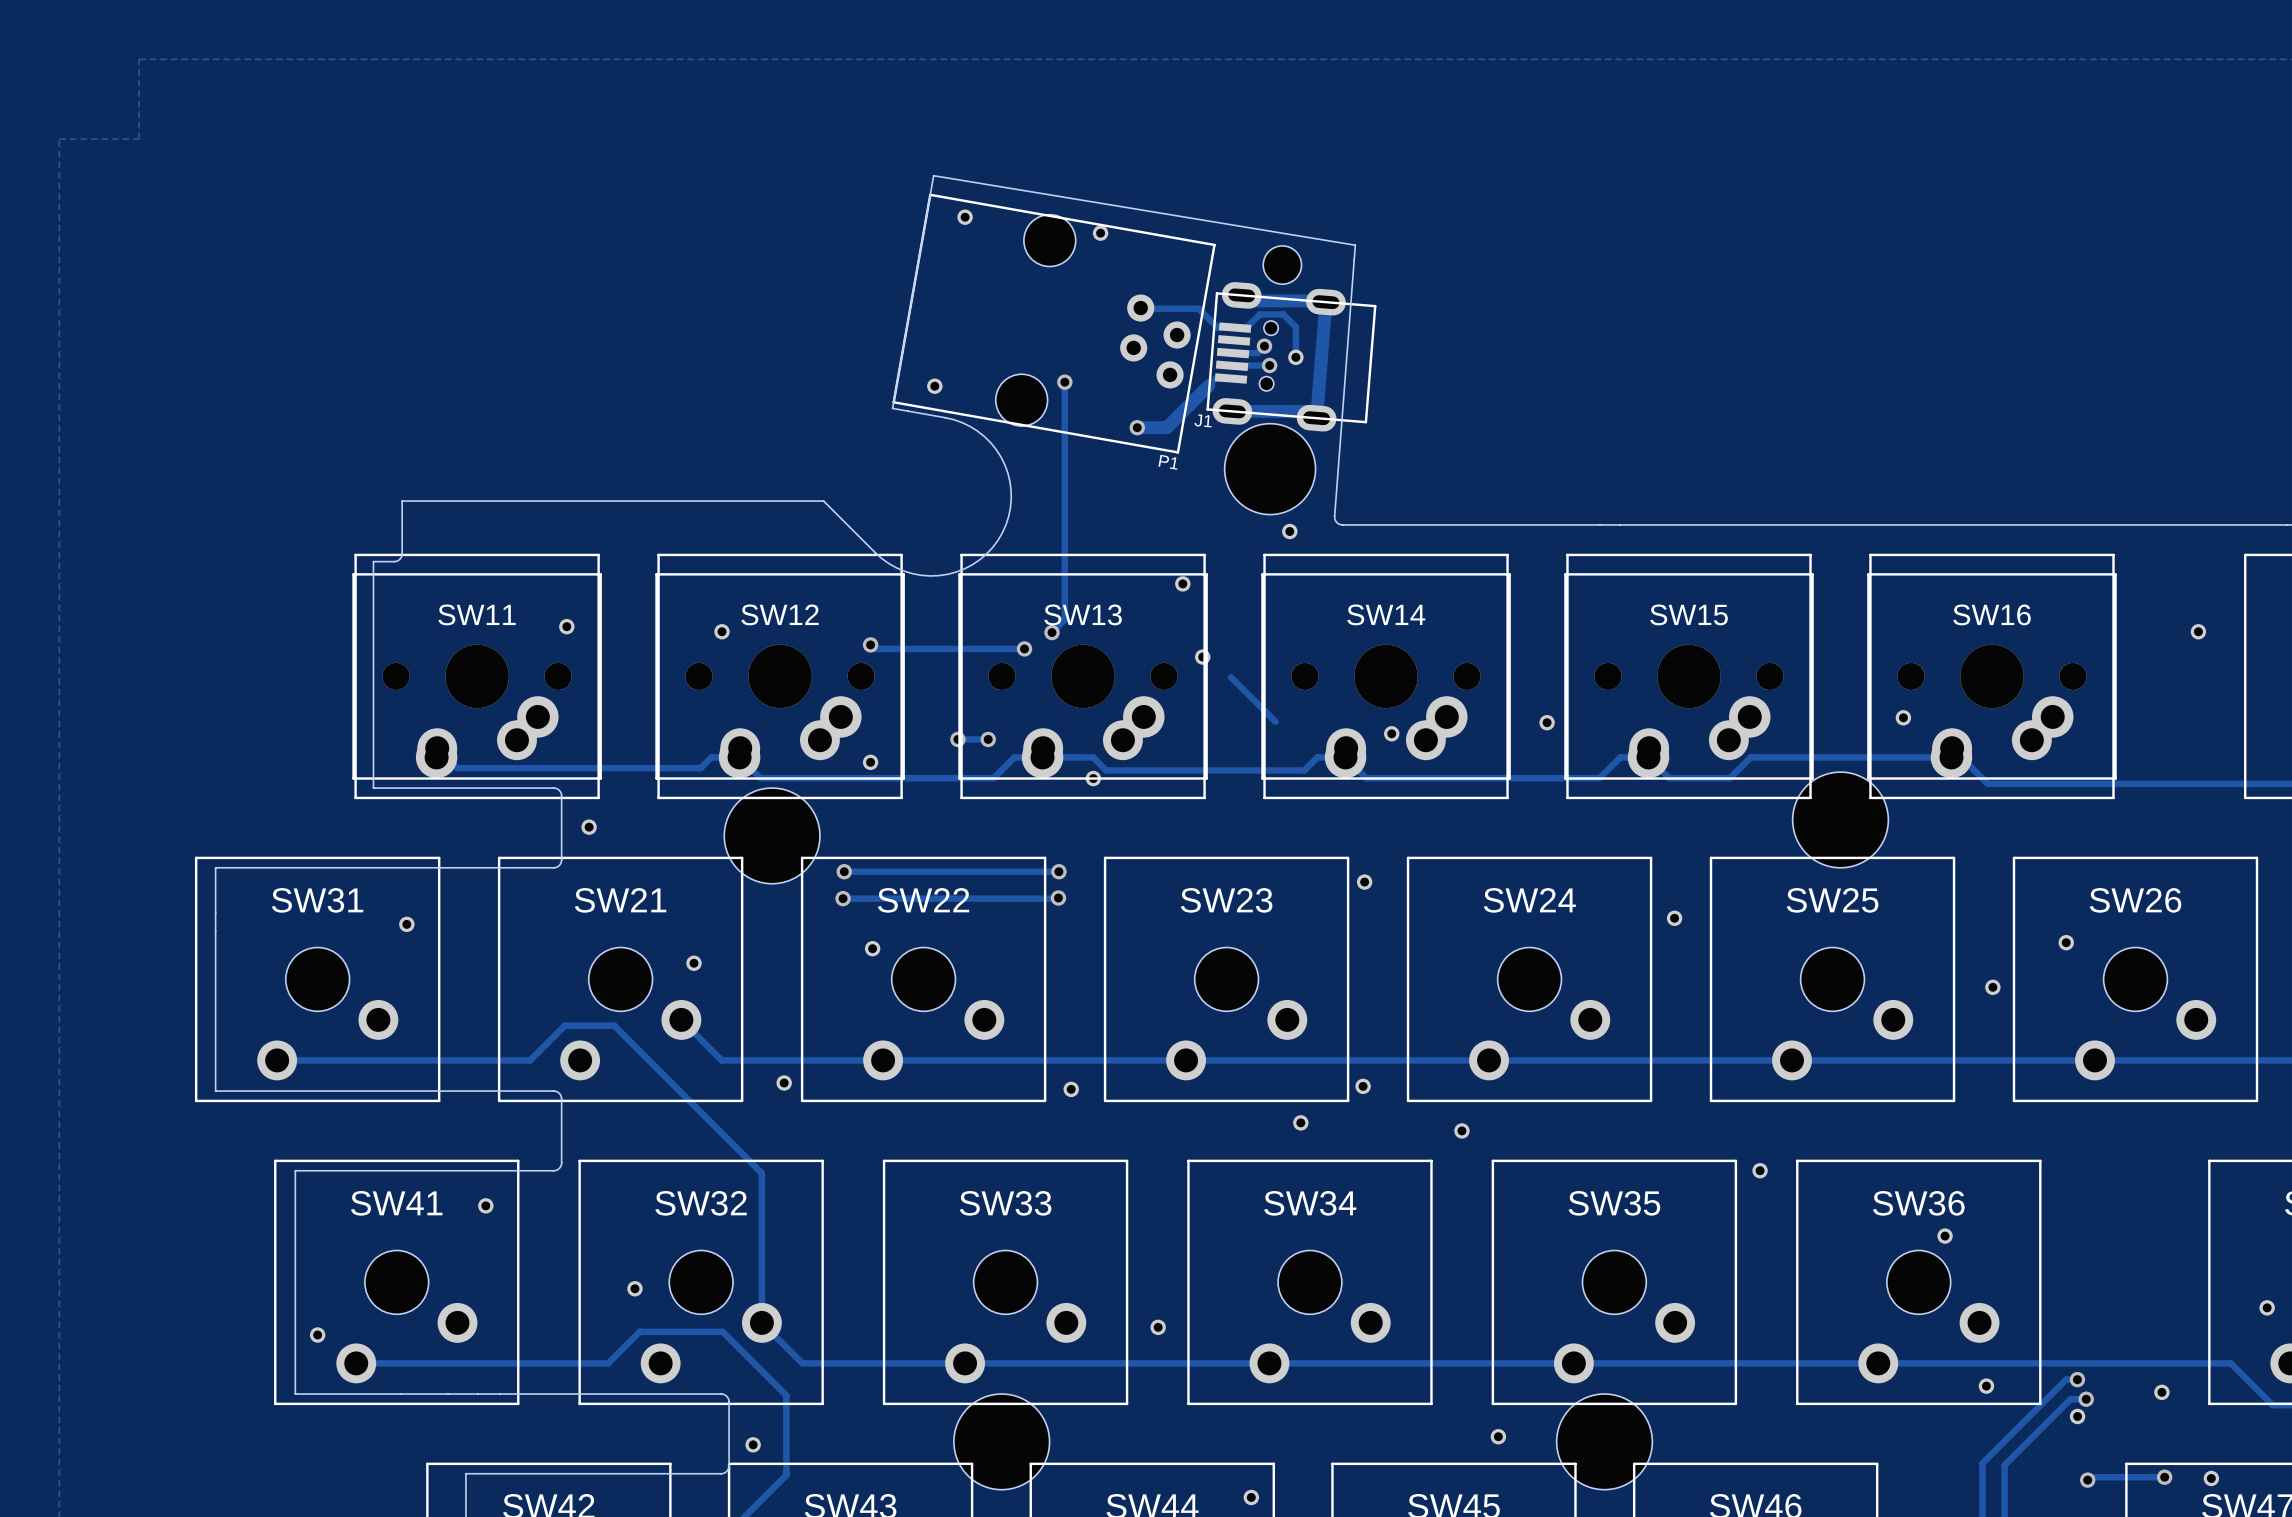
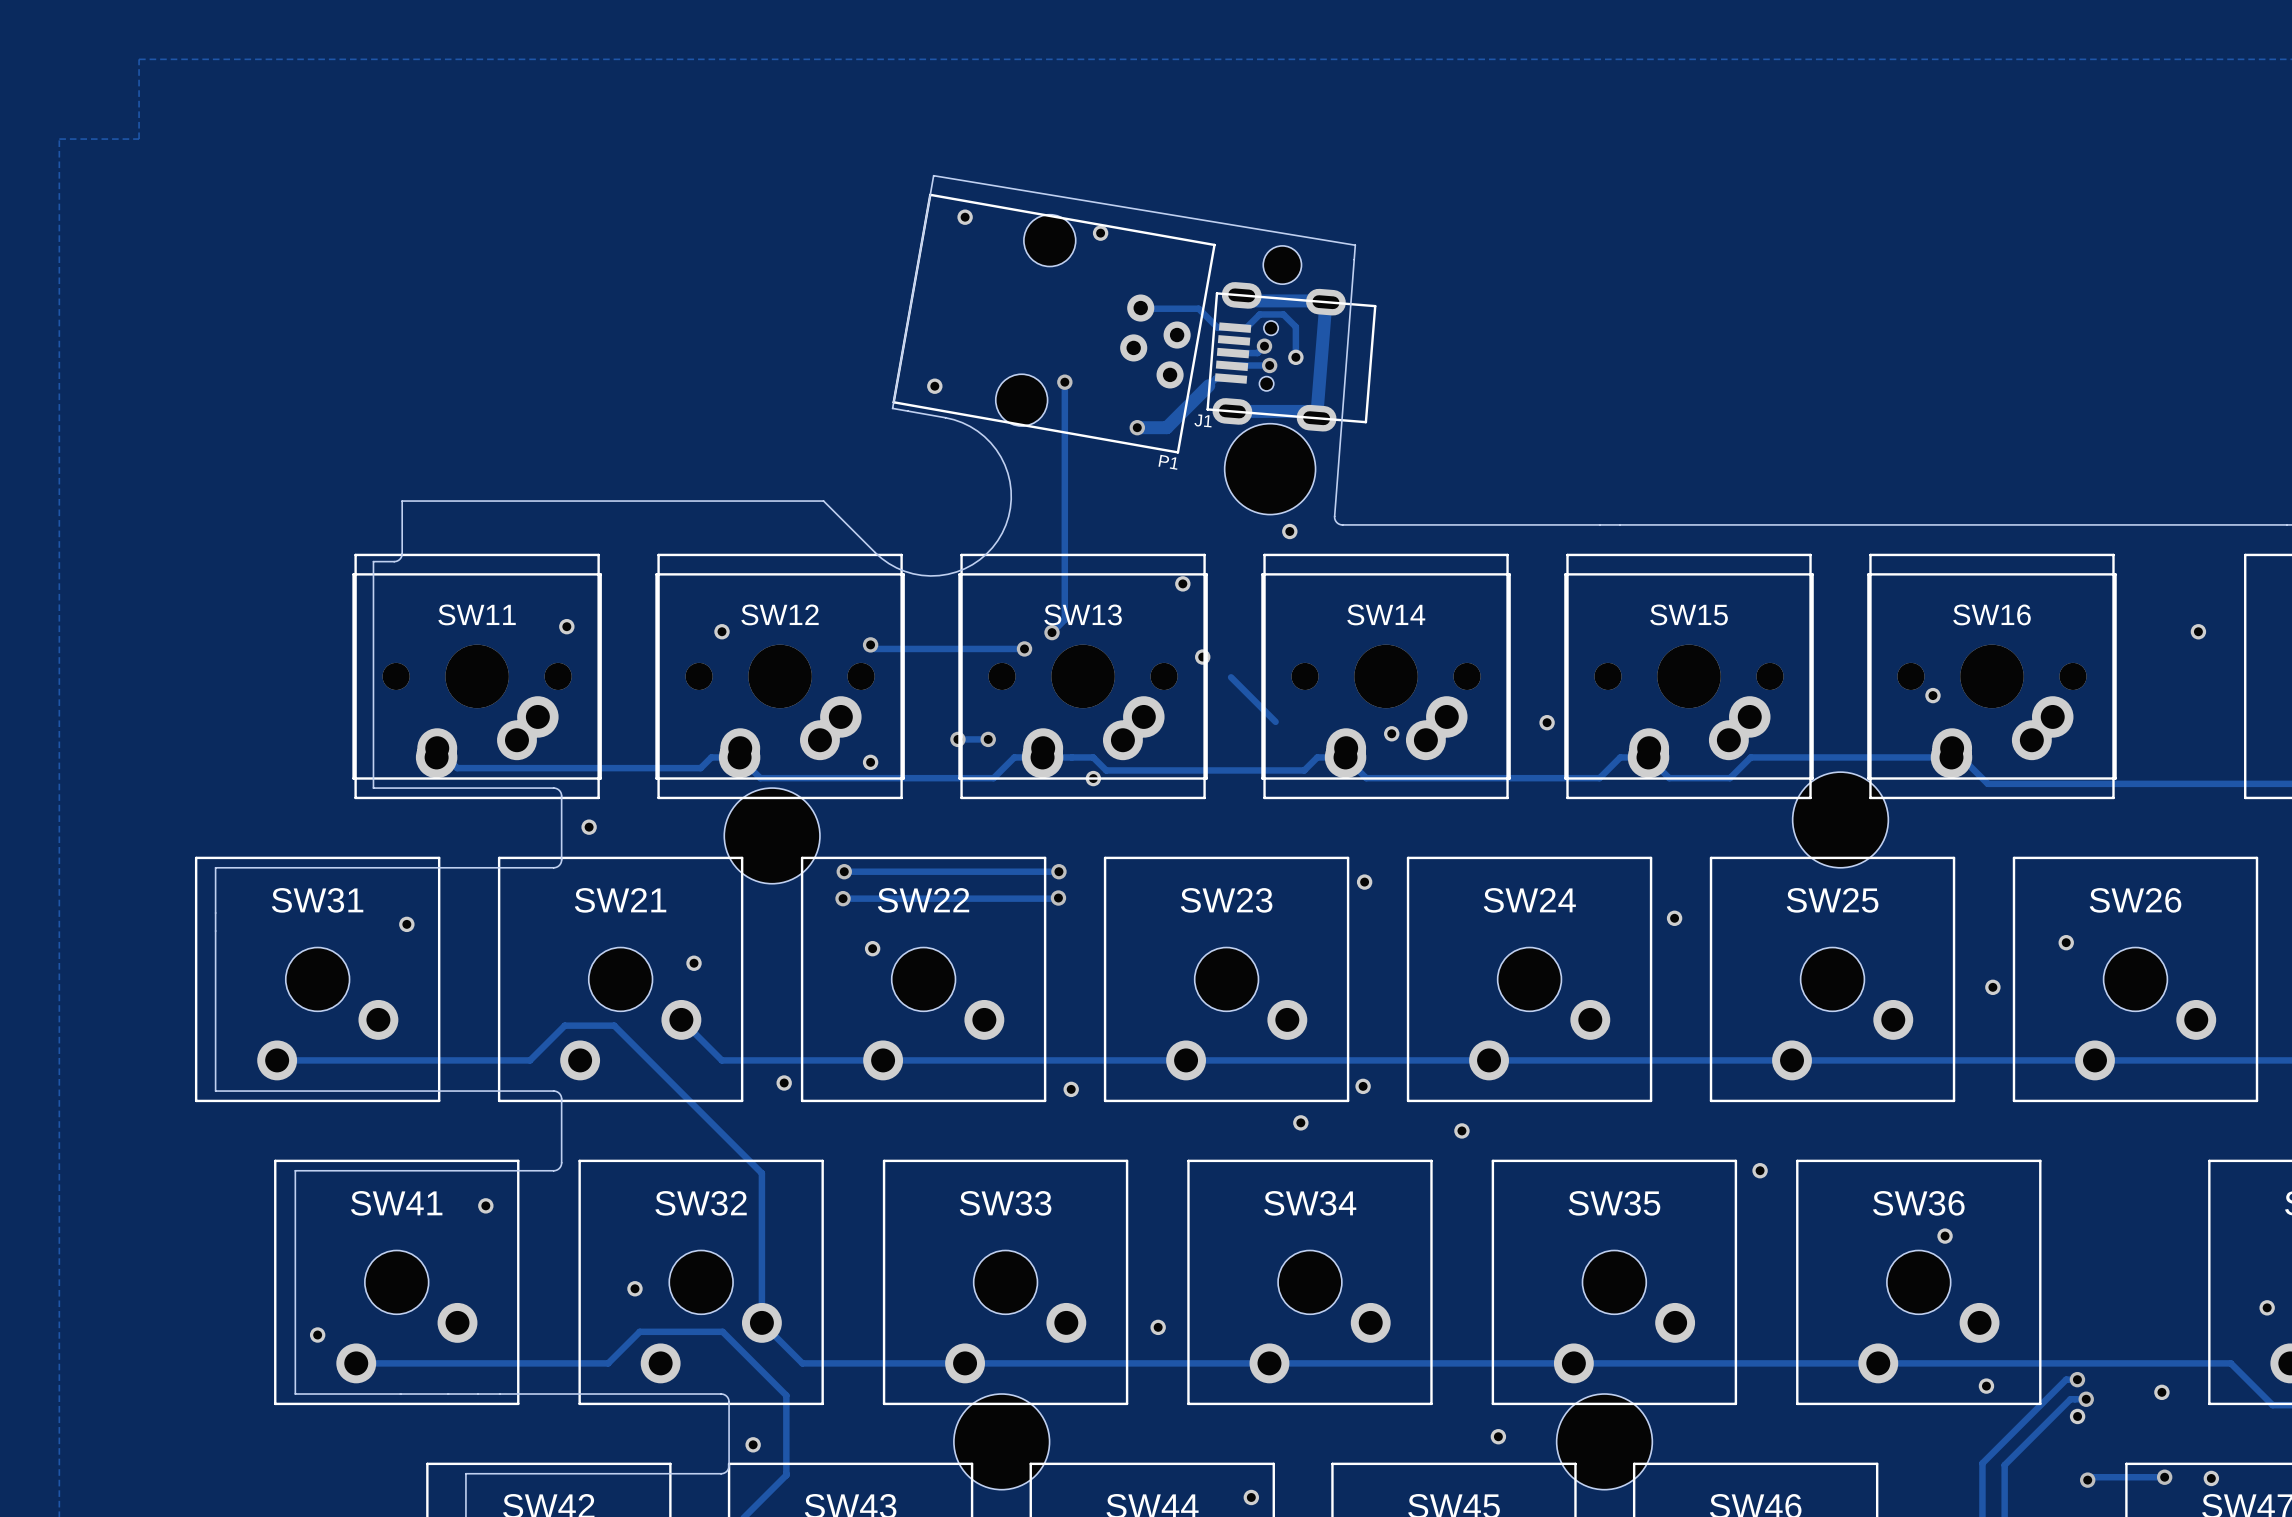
part position: (1903, 717) -> (1932, 695)

